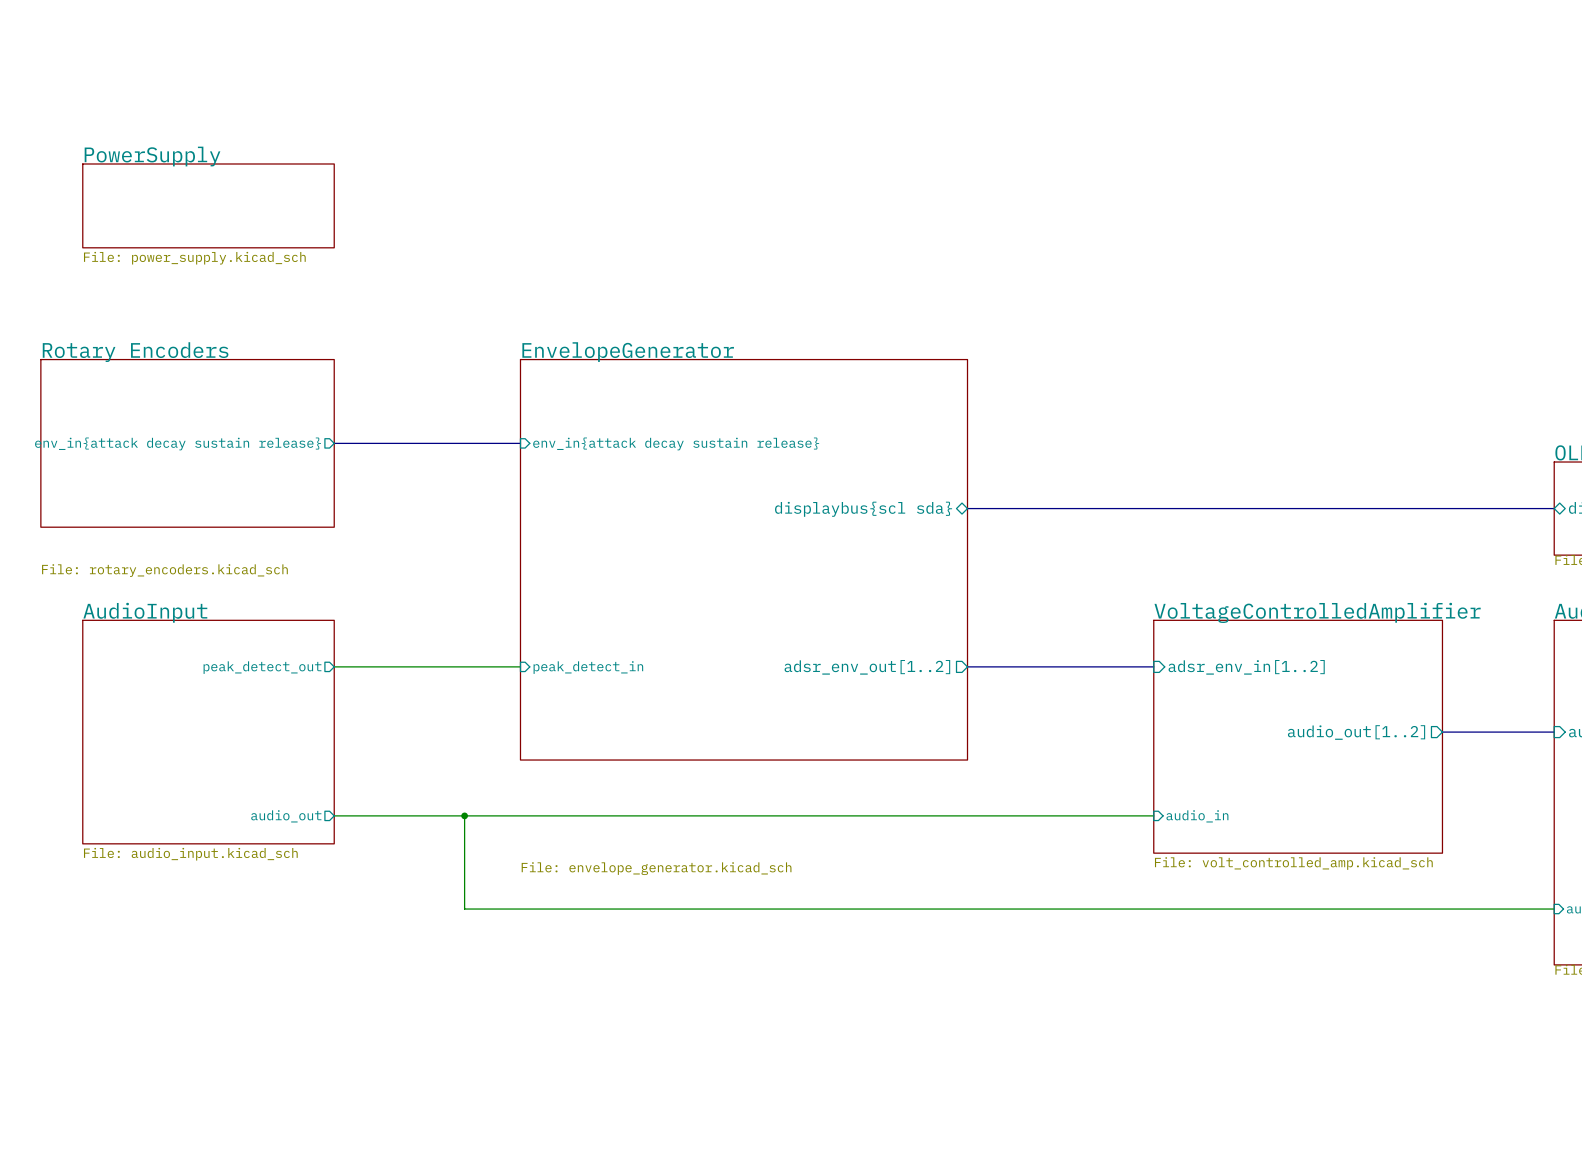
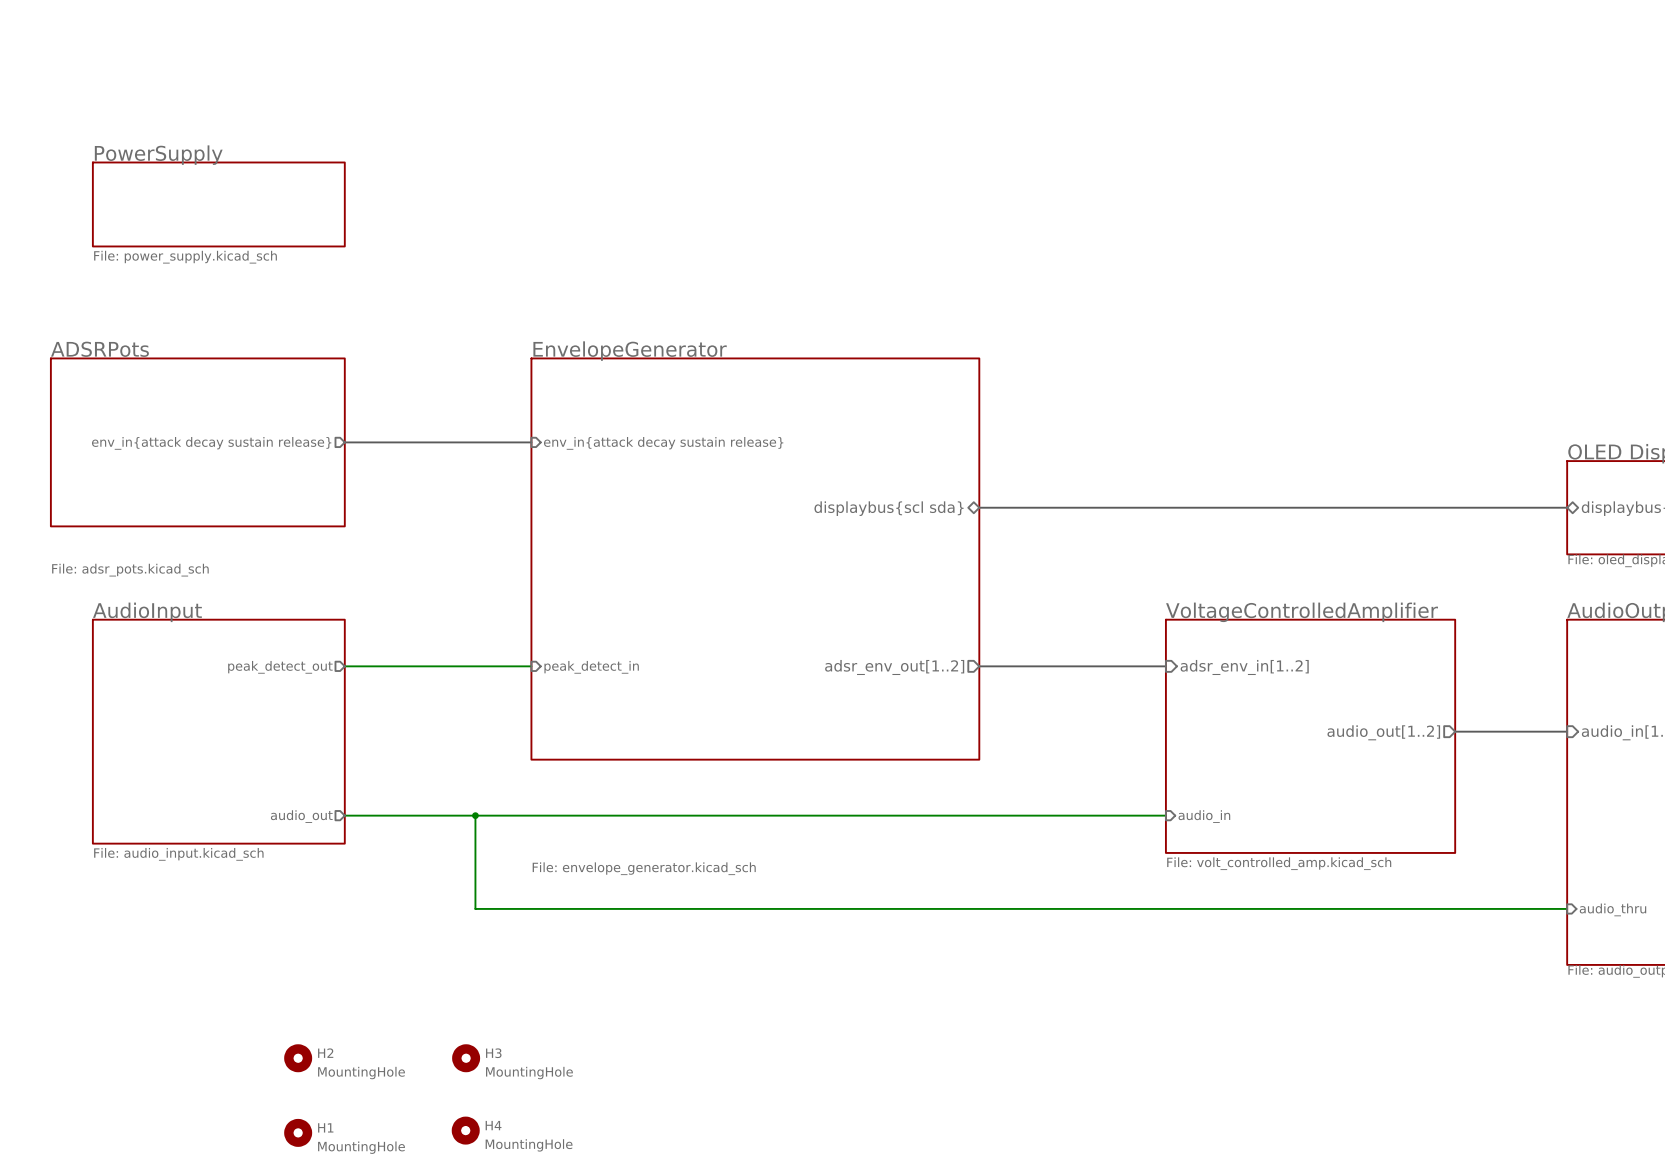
sheet Rotary Encoders name: Rotary Encoders (135, 352) -> ADSRPots (99, 349)
sheet Rotary Encoders value: File: rotary_encoders.kicad_sch (164, 570) -> File: adsr_pots.kicad_sch (130, 570)
H2: none -> MountingHole (298, 1058)
H3: none -> MountingHole (466, 1058)
H4: none -> MountingHole (465, 1130)
H1: none -> MountingHole (298, 1132)

